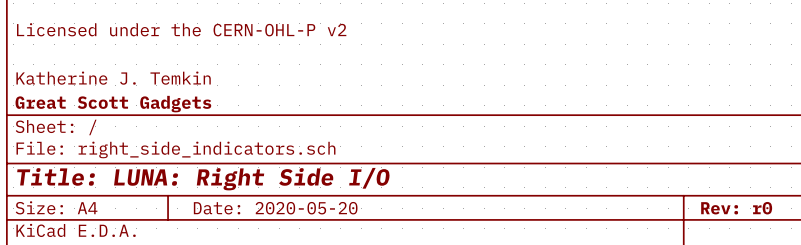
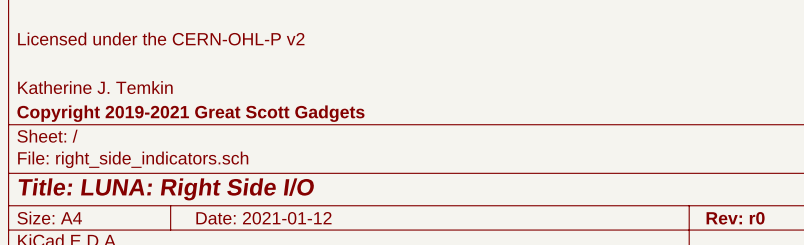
title block: Great Scott Gadgets (113, 104) -> Copyright 2019-2021 Great Scott Gadgets (190, 113)
title block: Date: 2020-05-20 (275, 208) -> Date: 2021-01-12 (263, 218)

